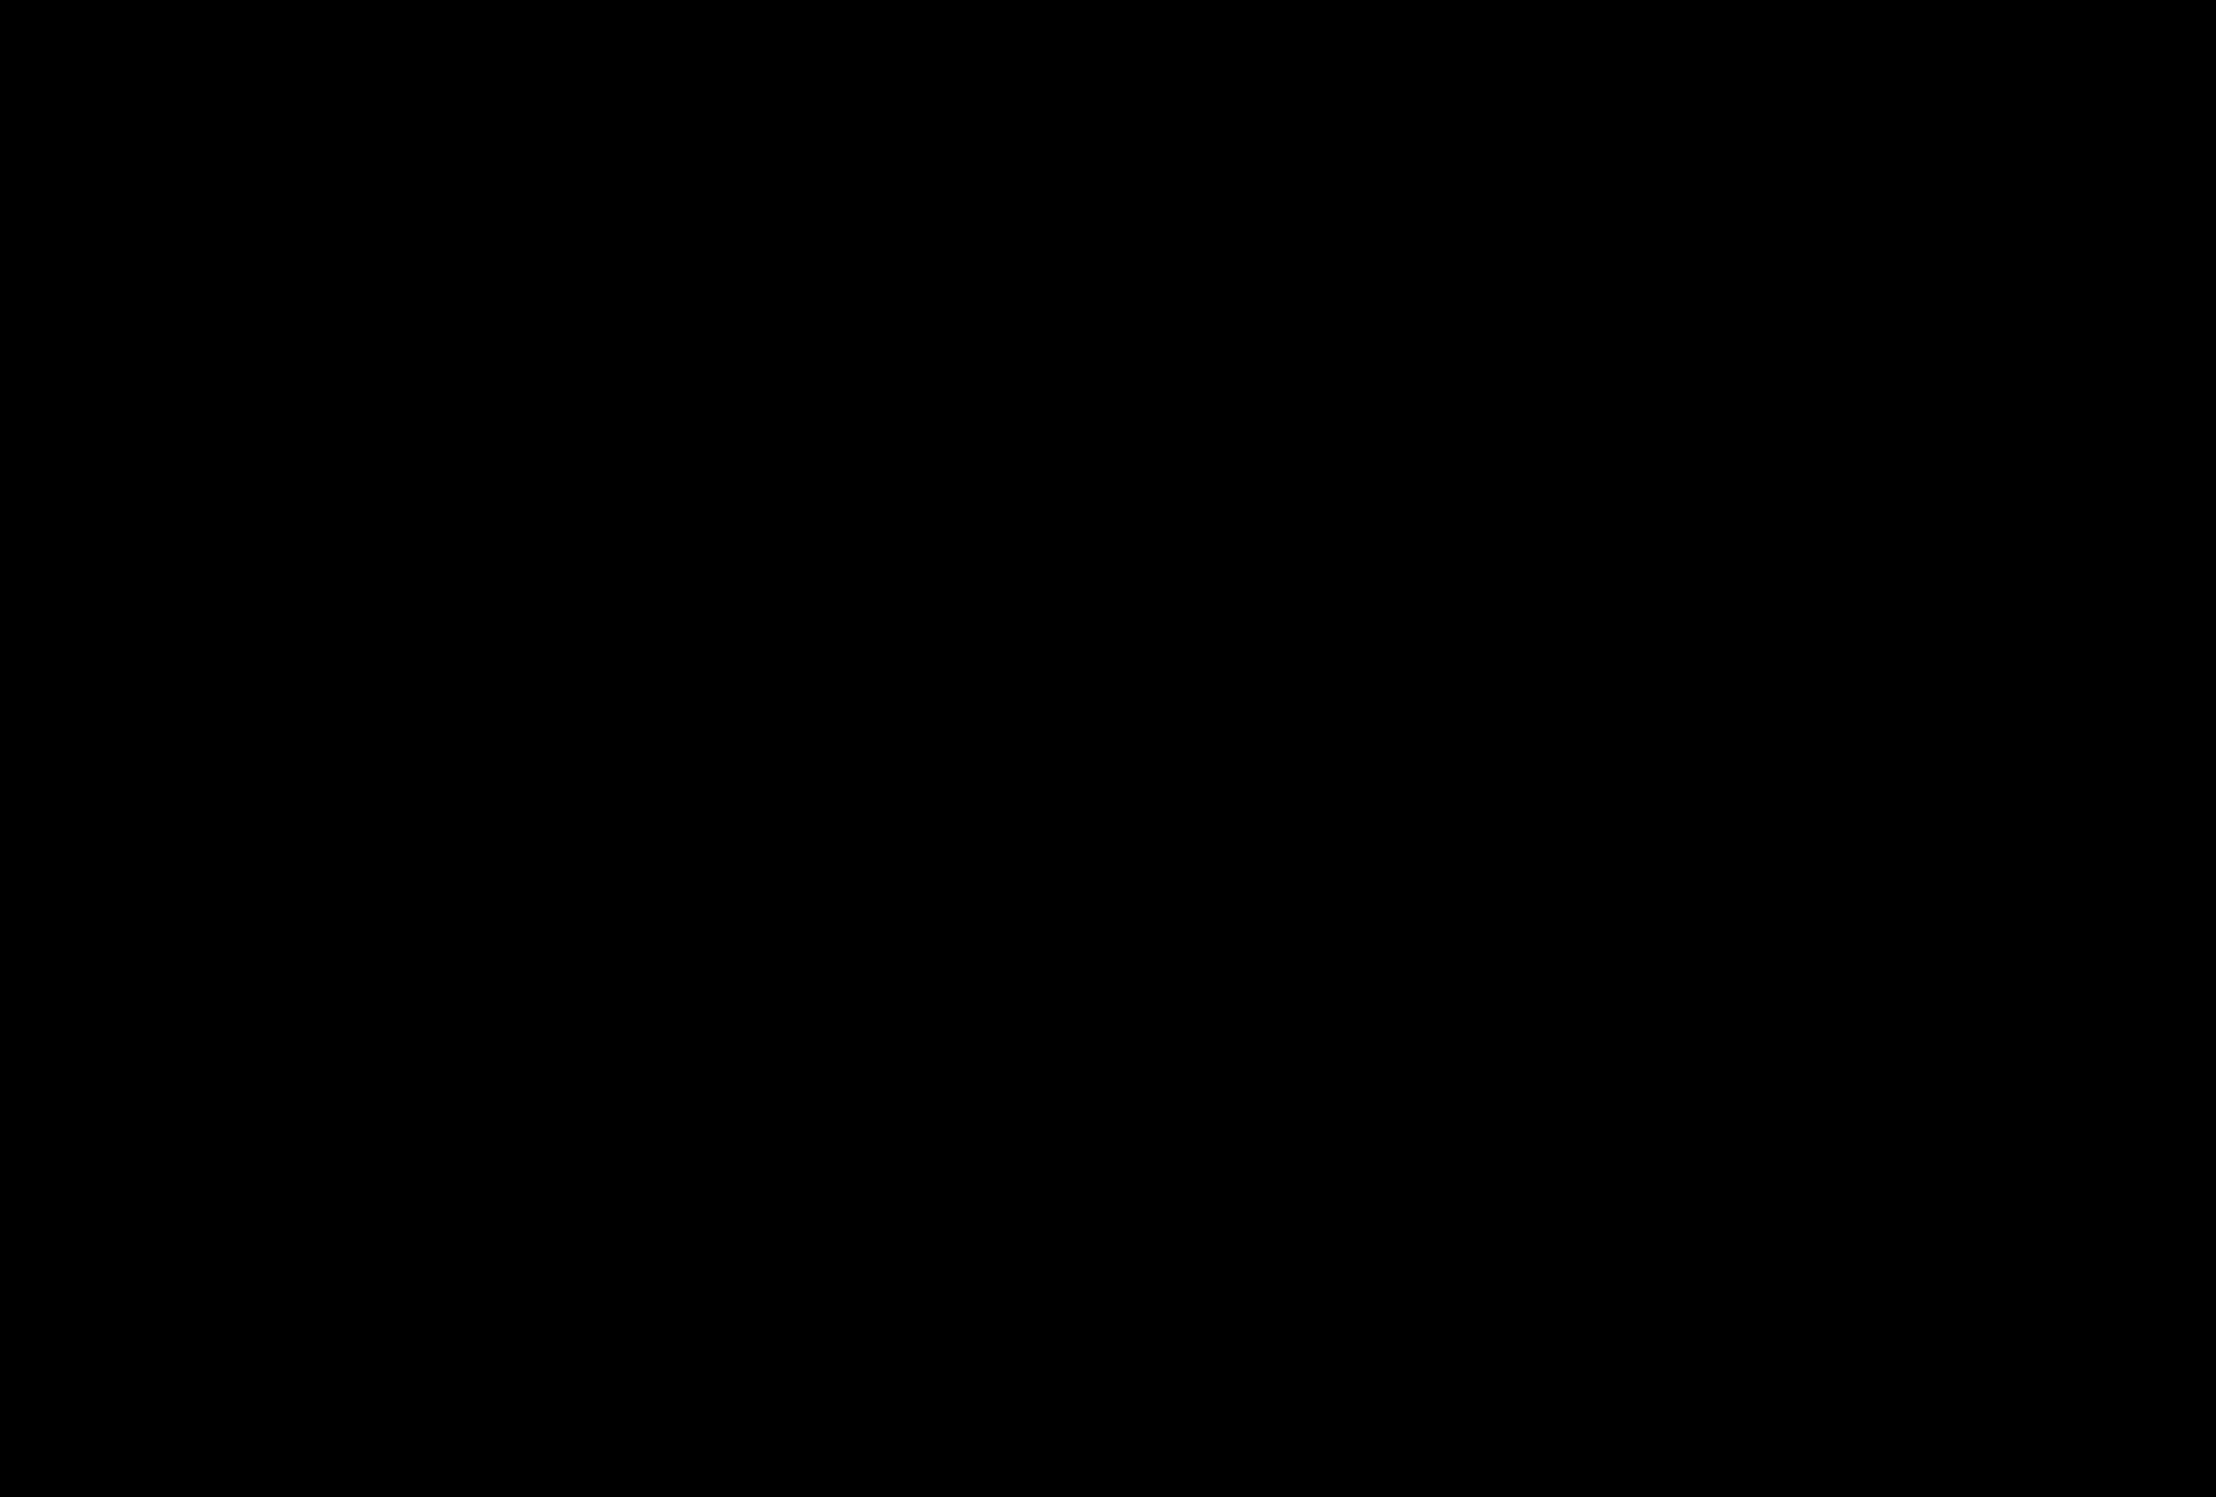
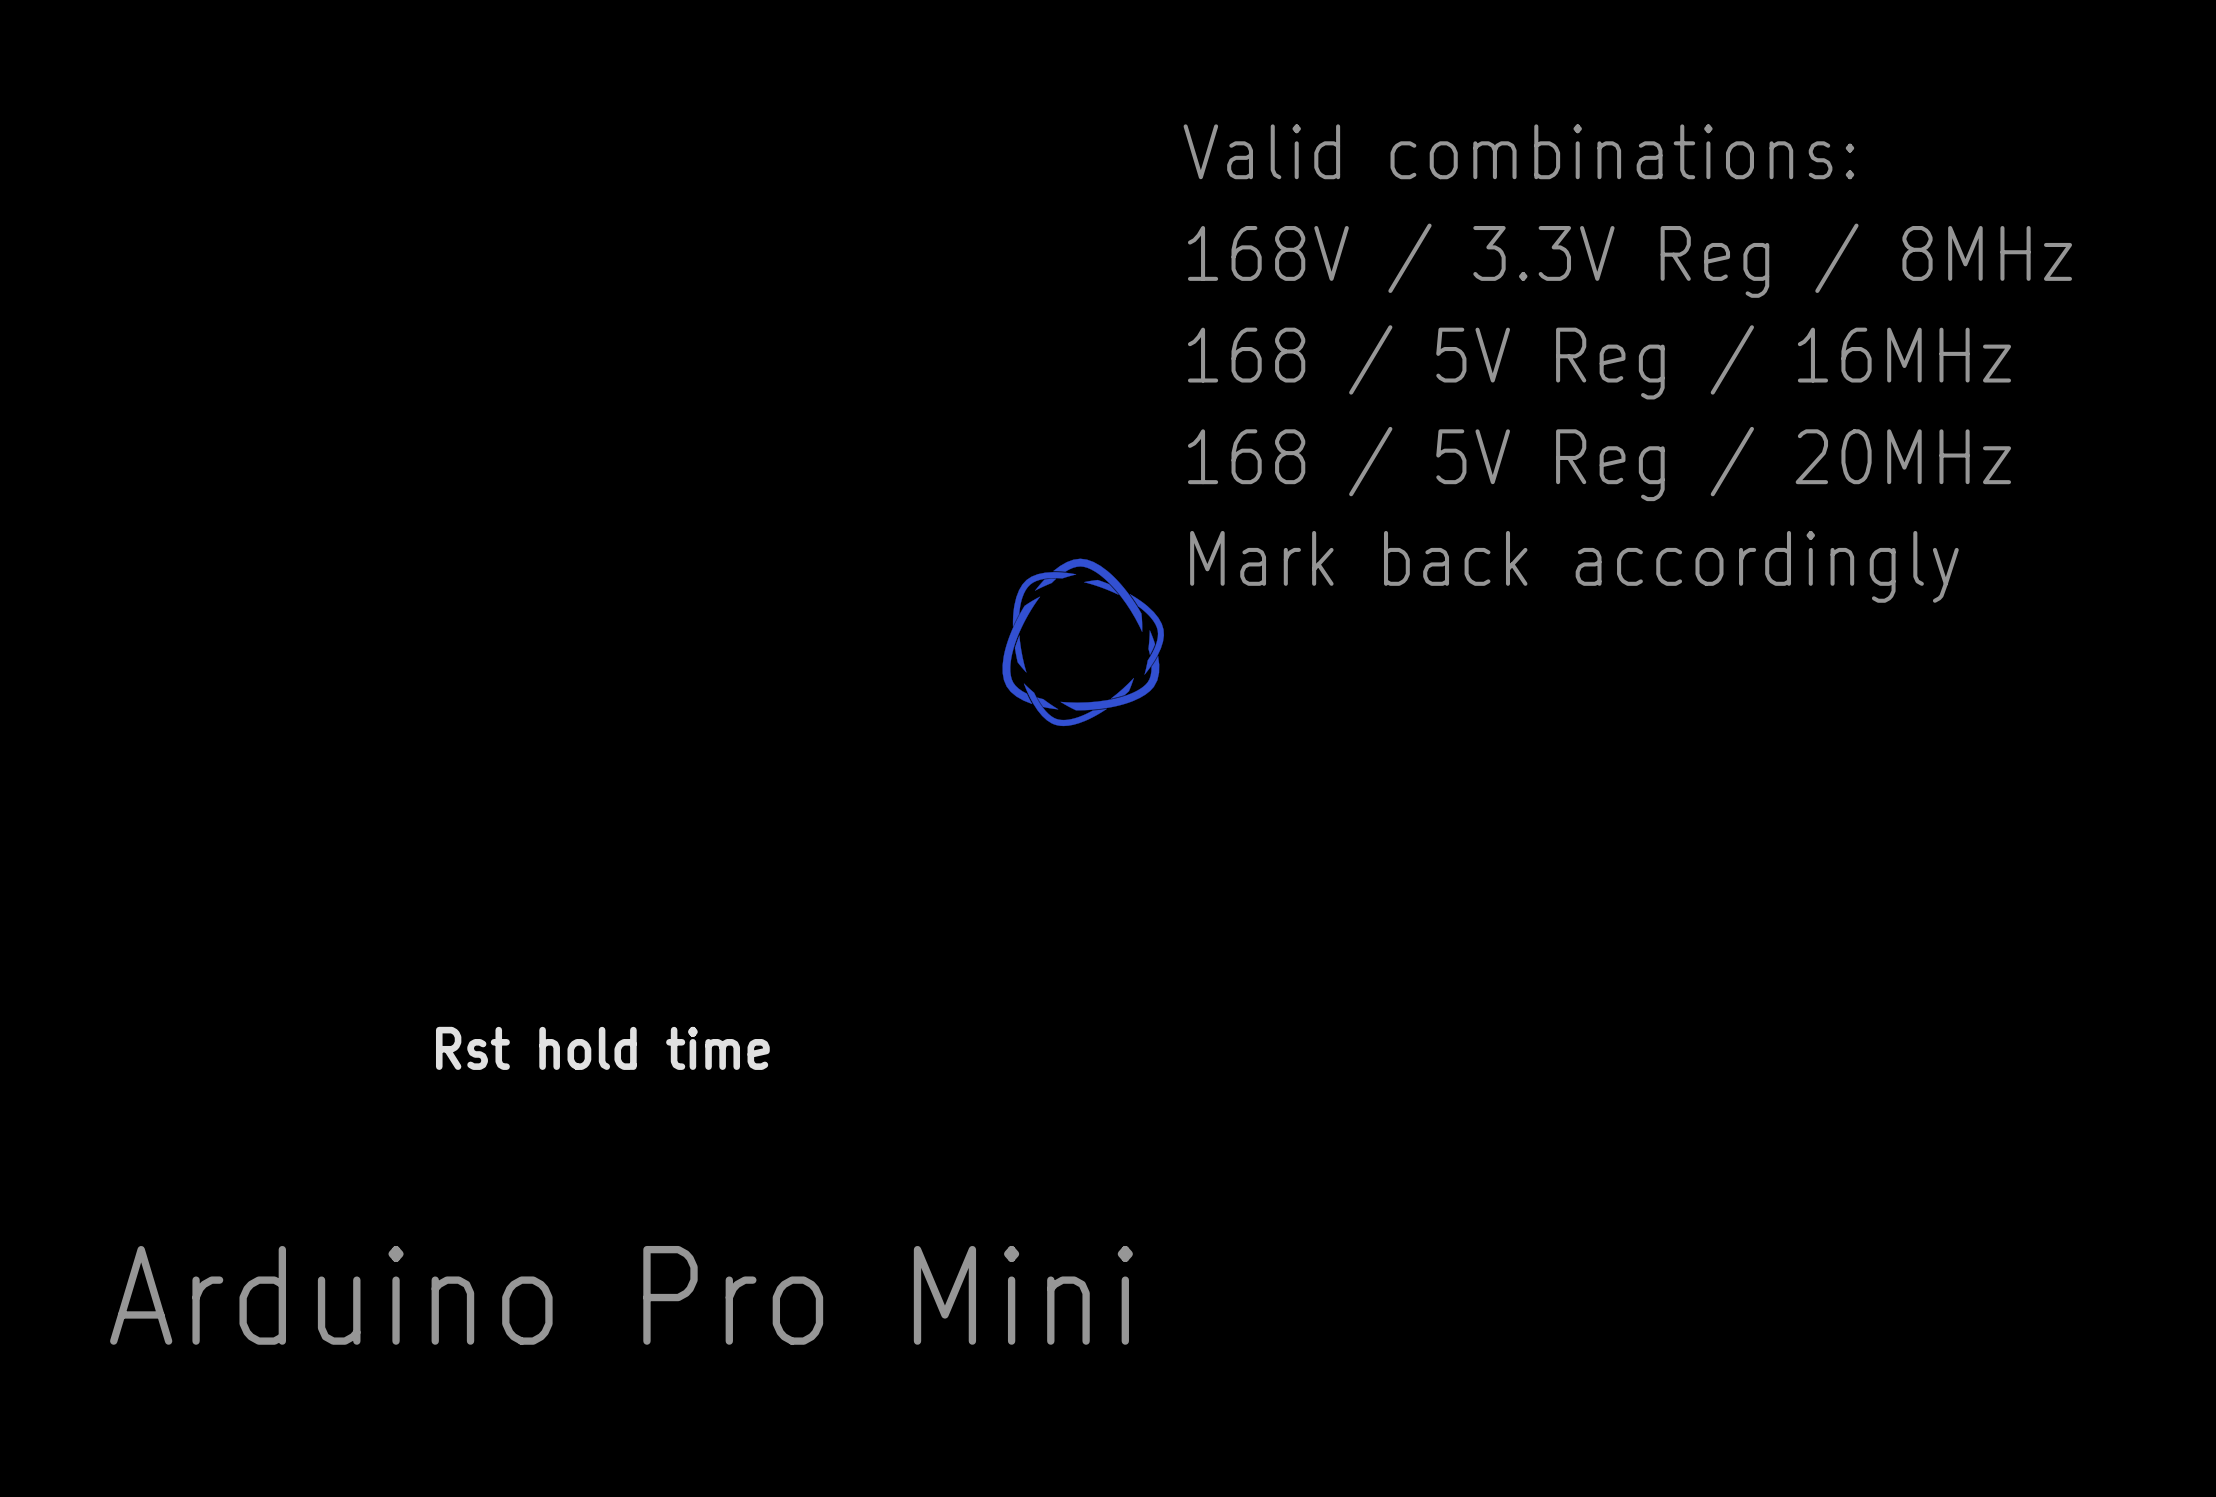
text: none -> Valid combinations: (1518, 151)
text: none -> 168V / 3.3V Reg / 8MHz (1629, 260)
text: none -> 168 / 5V Reg / 16MHz (1599, 362)
text: none -> 168 / 5V Reg / 20MHz (1599, 464)
drawing: none -> [1002, 558, 1165, 727]
text: none -> Mark back accordingly (1574, 566)
text: none -> Rst hold time (602, 1048)
text: none -> Arduino Pro Mini (621, 1295)

